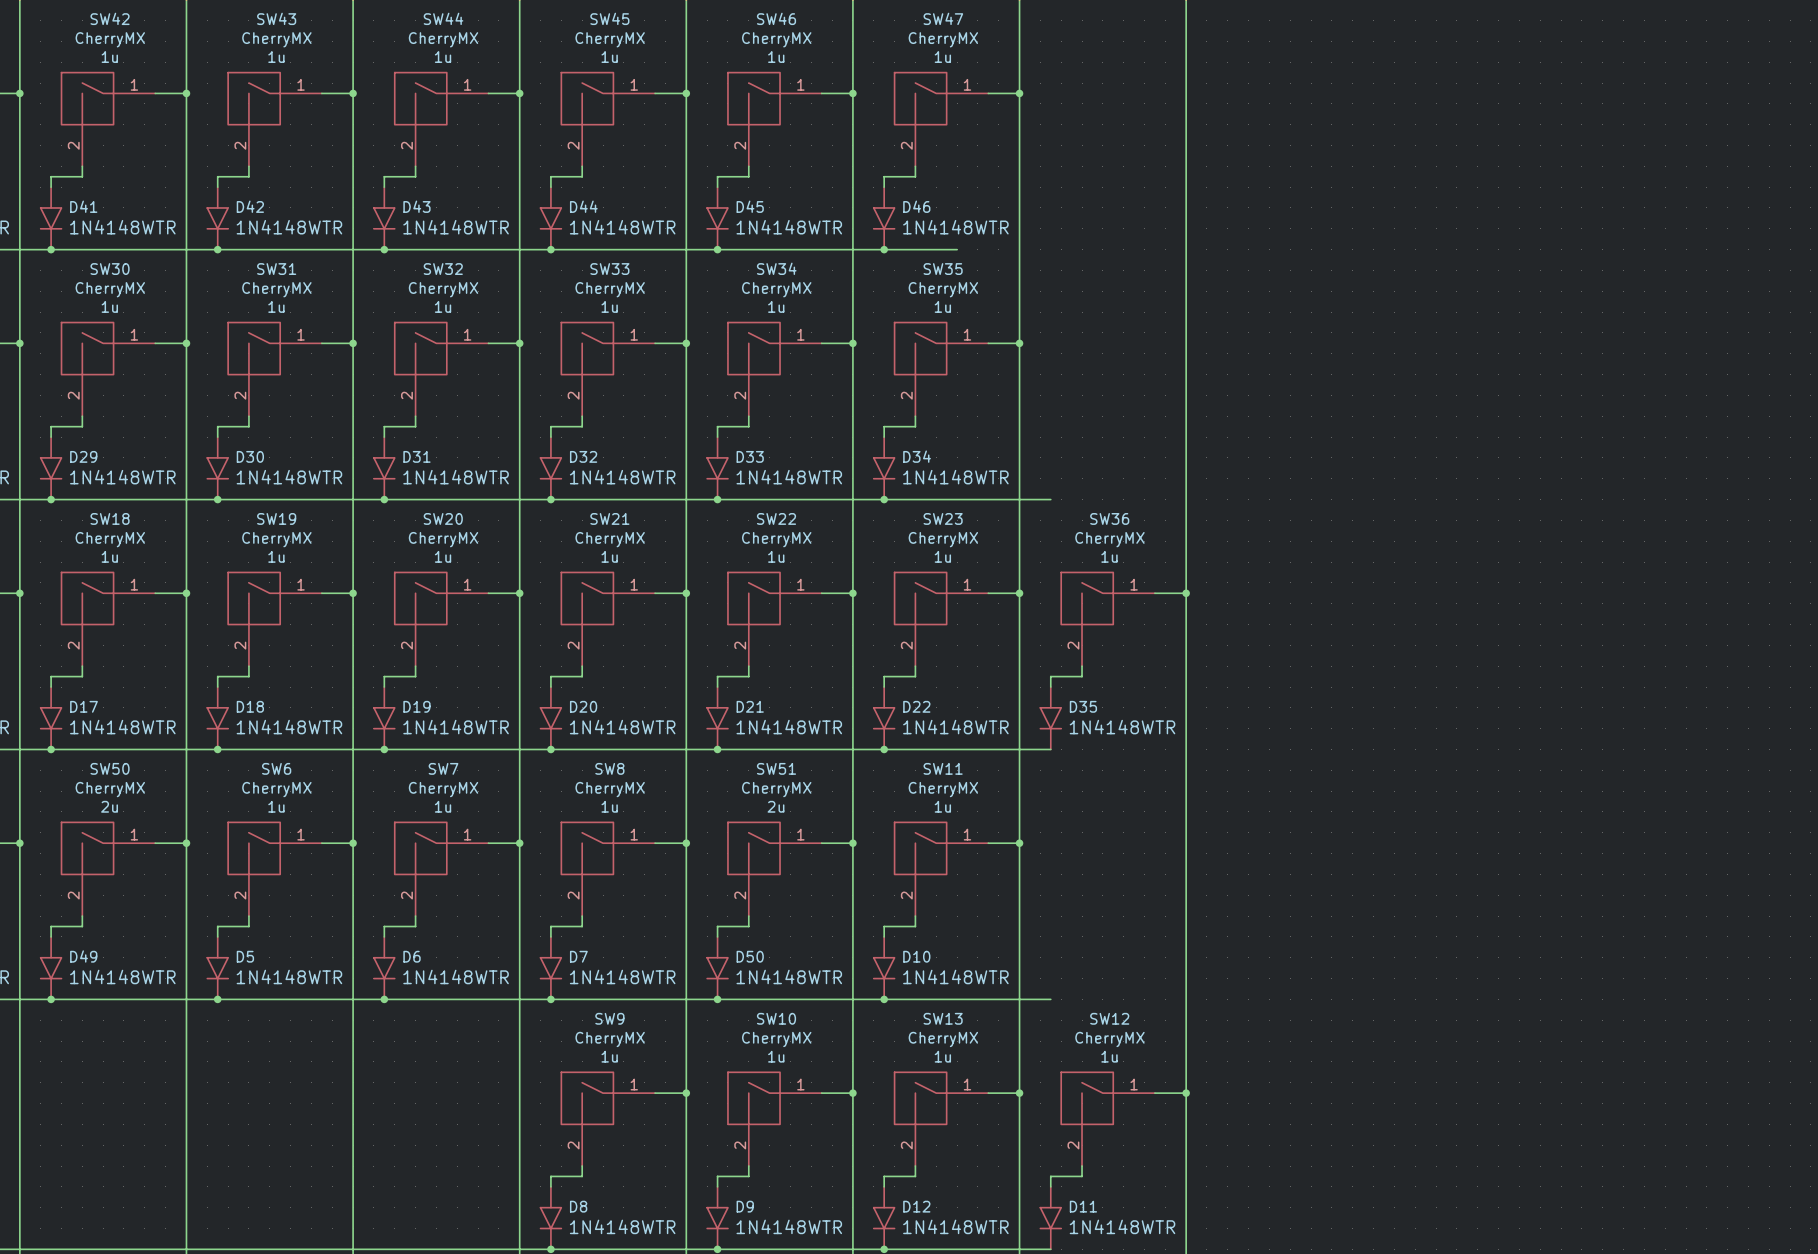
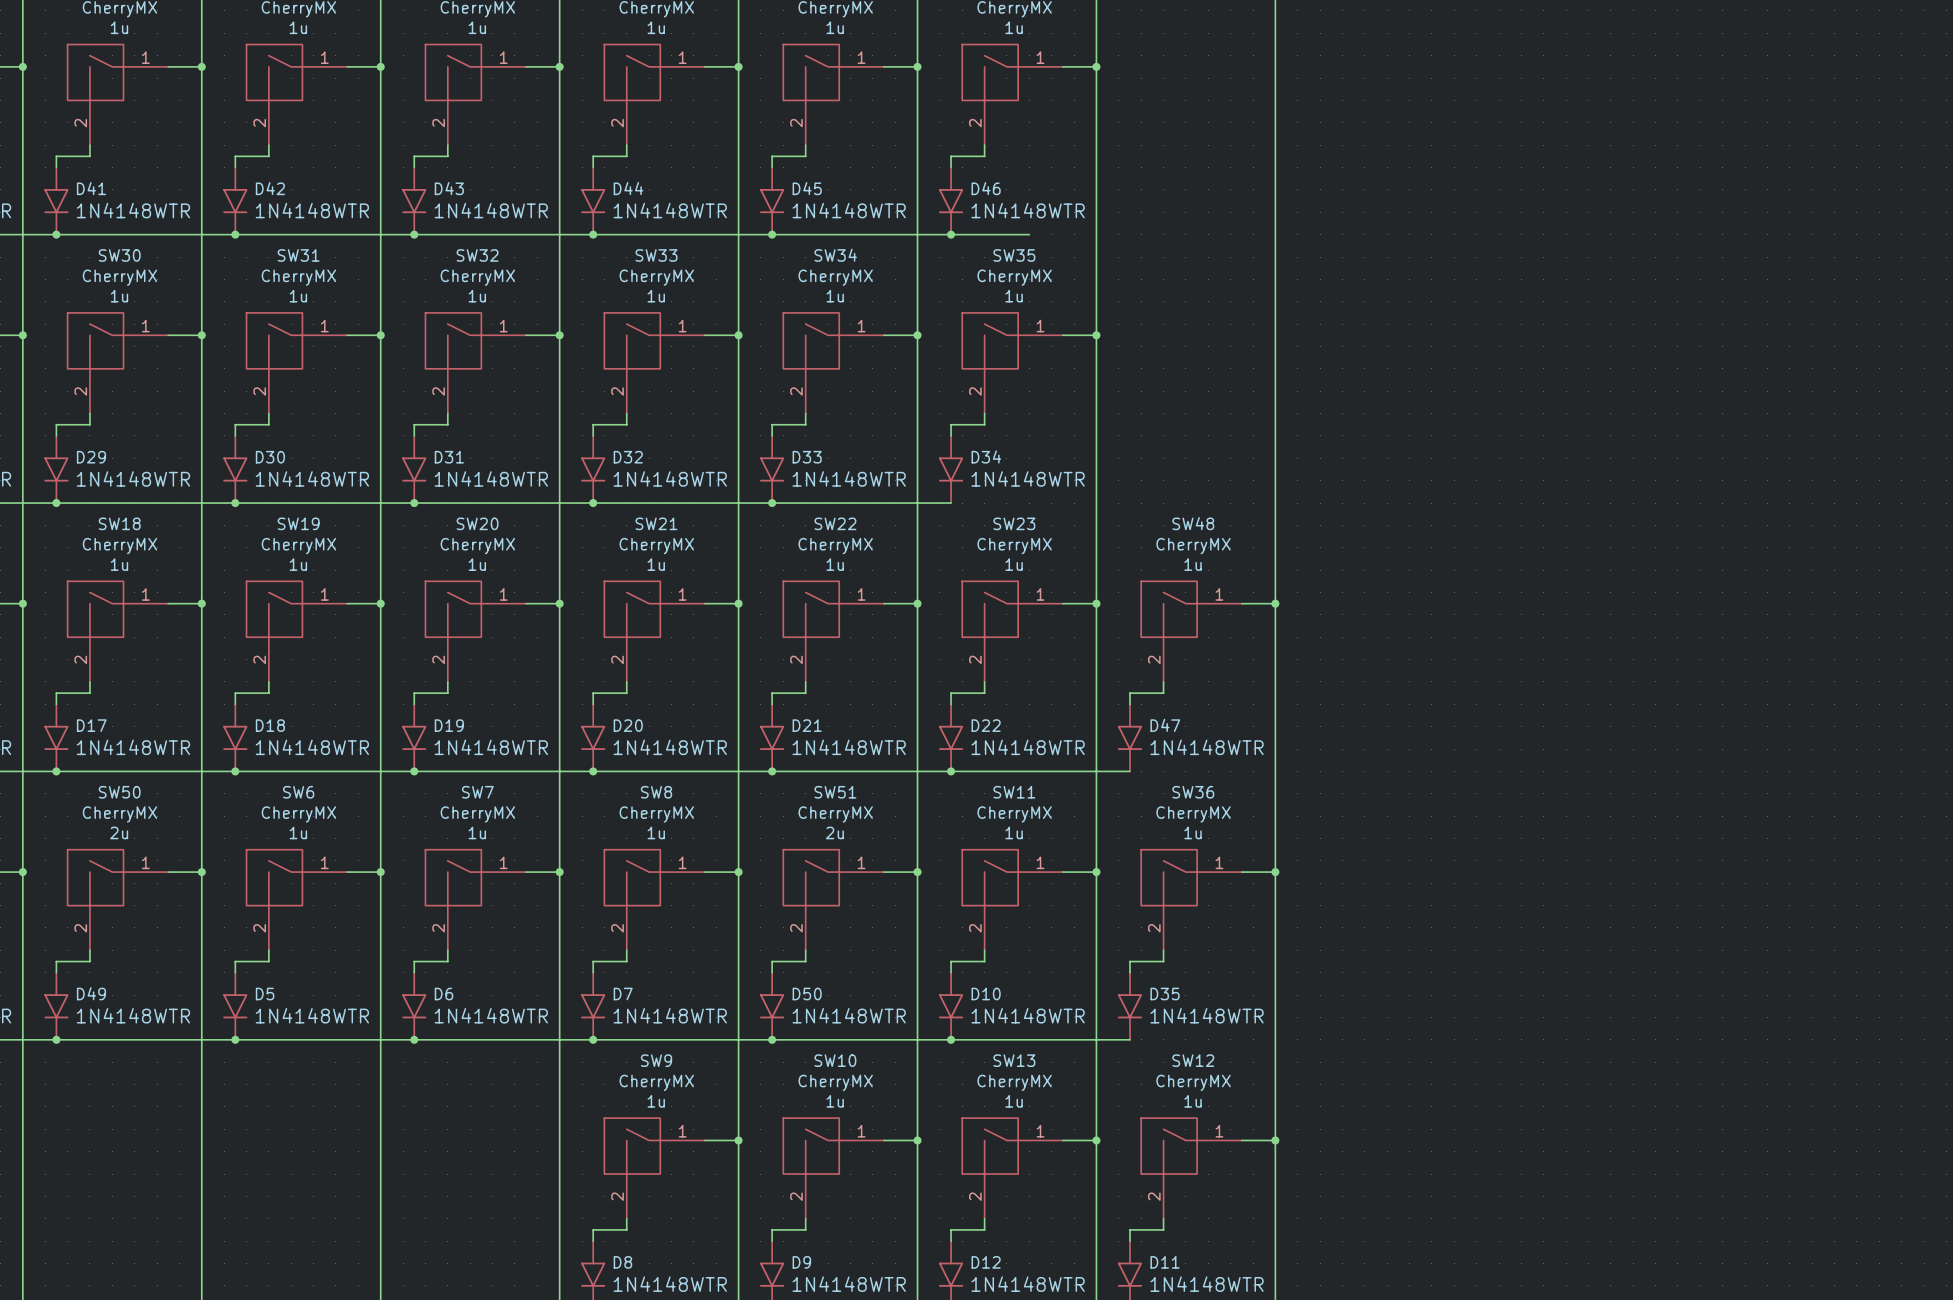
wire: (884, 499) (1050, 499) -> none
junction: (884, 499) -> none
SW36 name: SW36 (1109, 518) -> SW48 (1193, 523)
D35 name: D35 (1083, 706) -> D47 (1165, 725)
wire: none -> (1241, 872) (1275, 872)
junction: none -> (1275, 872)
SW36: none -> CherryMX (1191, 900)
wire: none -> (1163, 950) (1163, 961) (1129, 961) (1129, 972)
D35: none -> (1129, 1006)

